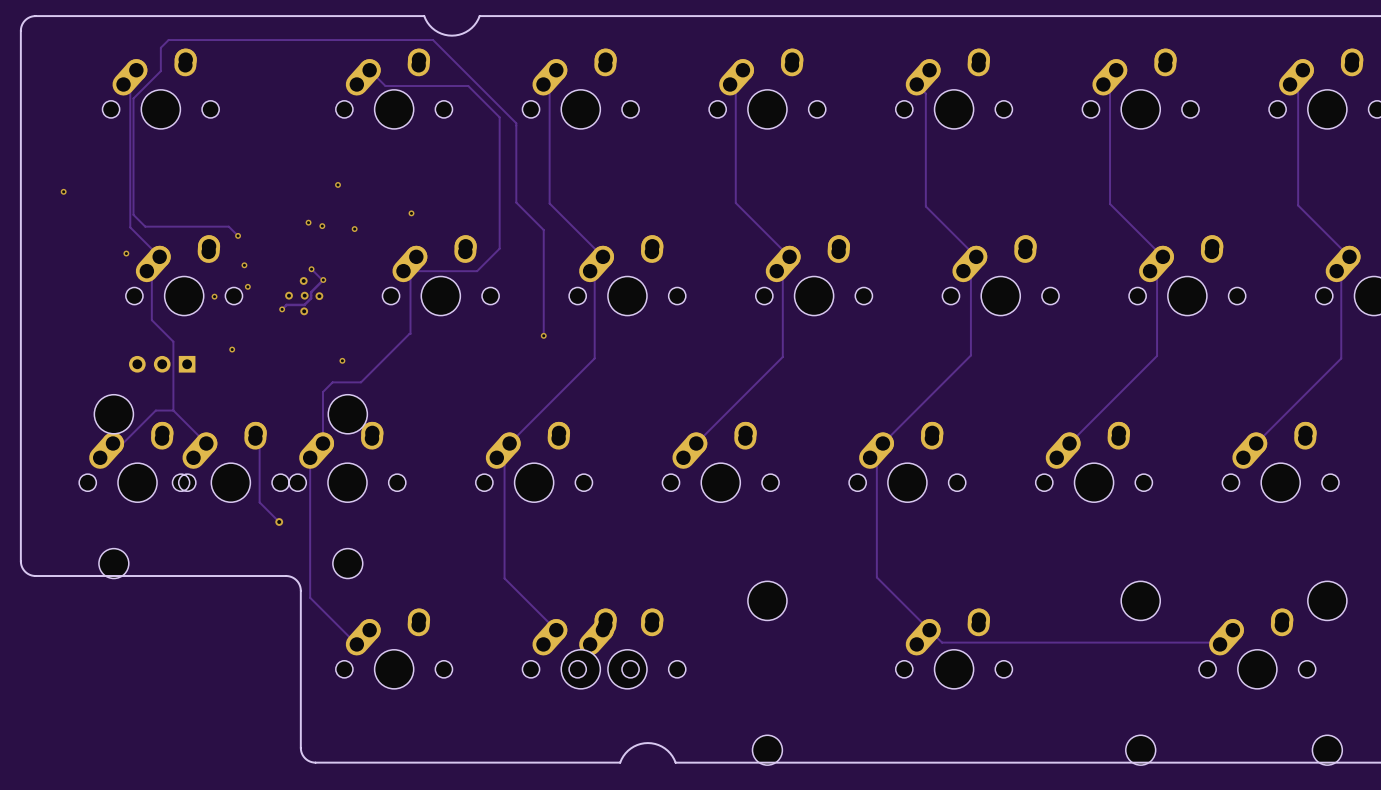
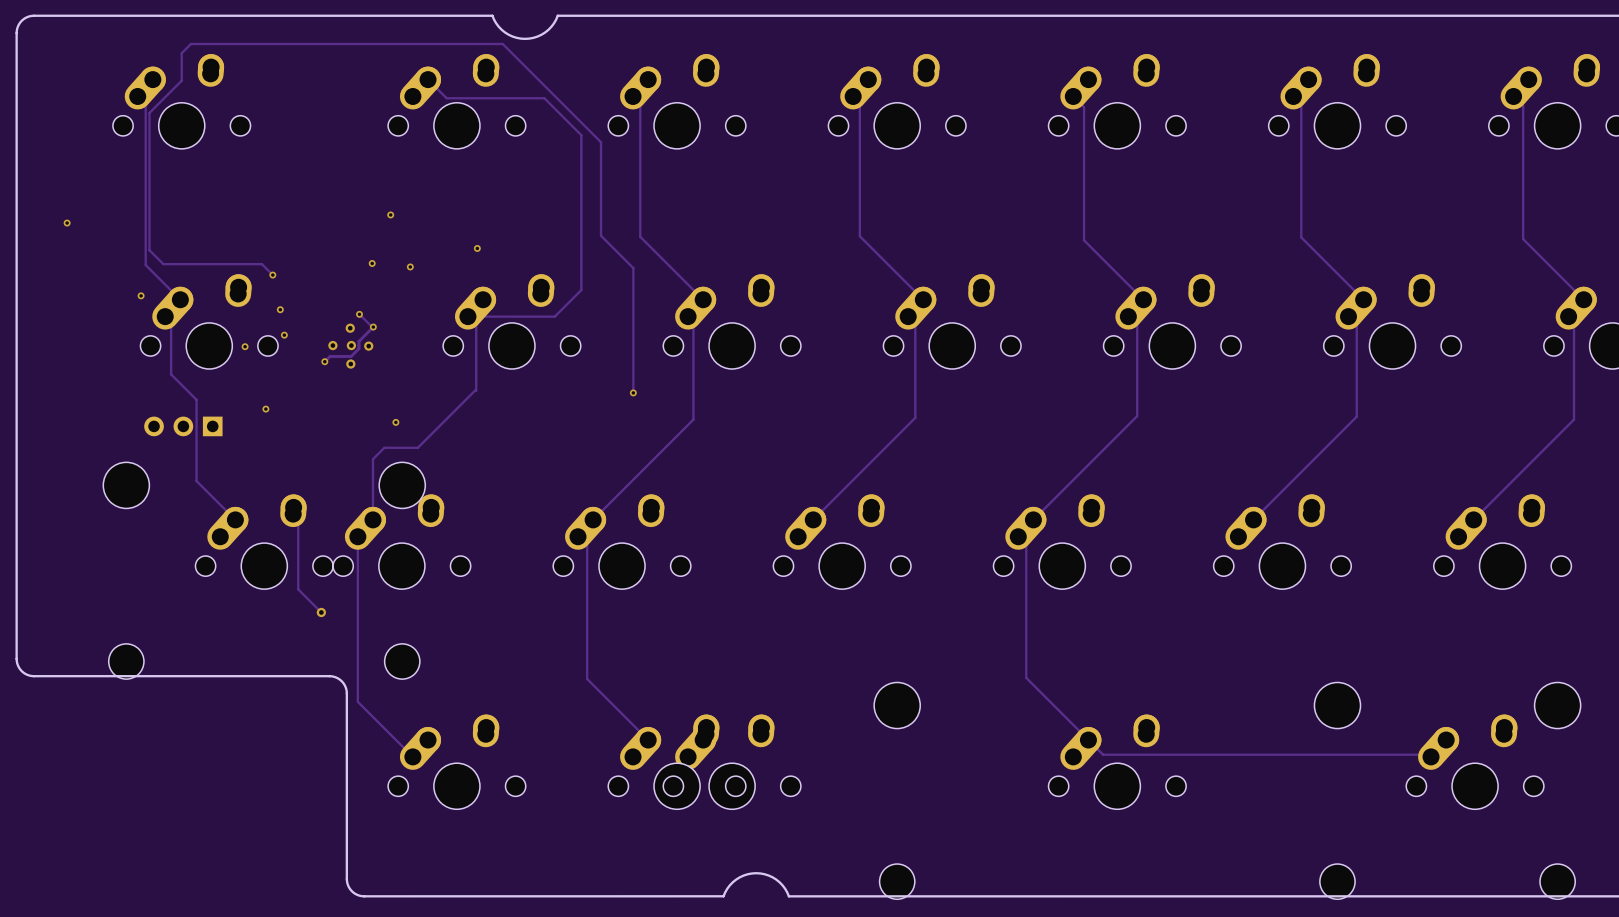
via: (308, 222) -> none
track: (173, 410) (155, 410) (122, 443) (113, 443) -> none
part: (137, 462) -> none

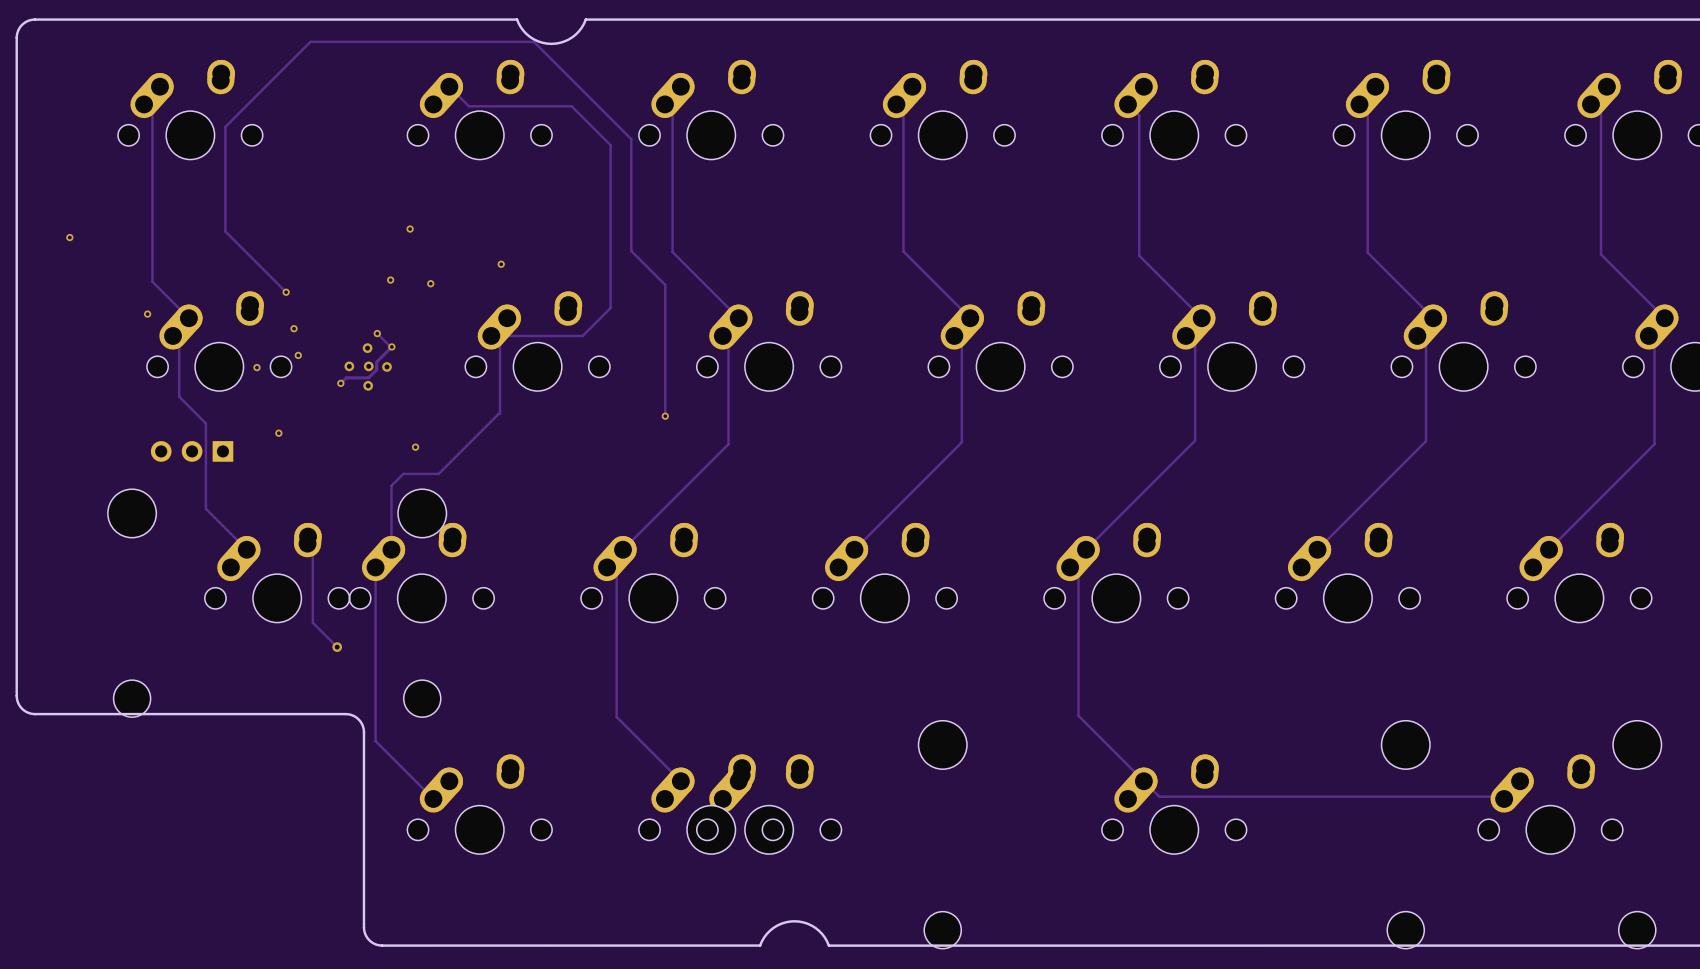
track: (601, 142) (502, 44) (190, 44) (181, 53) (181, 80) (149, 112) (149, 250) (163, 264) (261, 264) -> (631, 152) (631, 139) (534, 41) (310, 41) (225, 126) (225, 231) (274, 280)

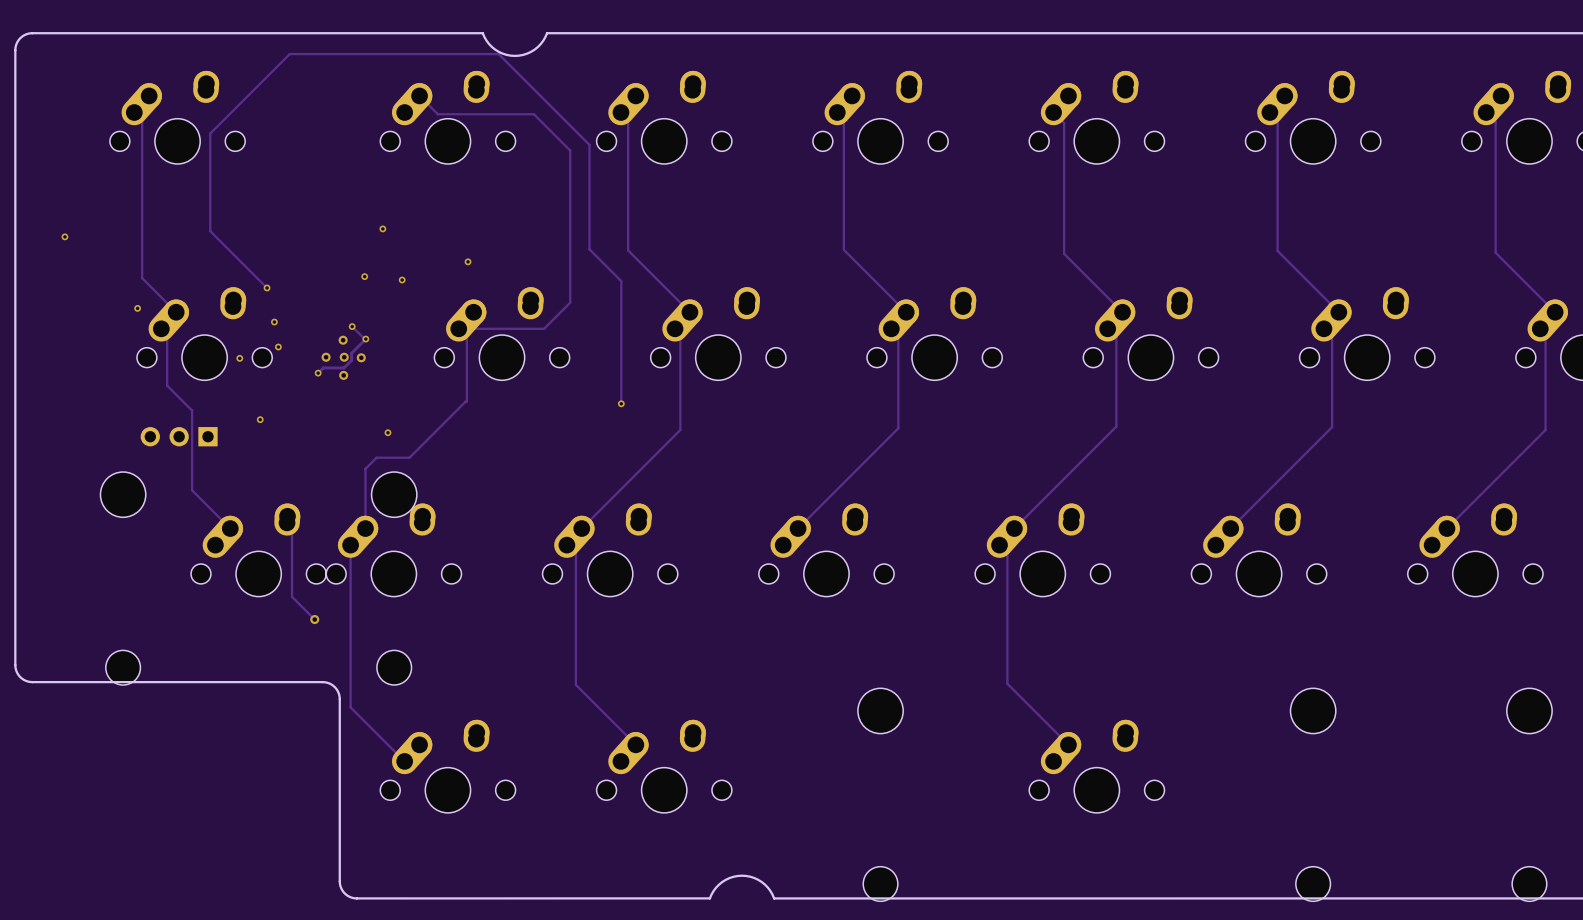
track: (1143, 781) (1159, 796) (1501, 796) (1504, 798) -> none
part: (769, 804) -> none
part: (1550, 804) -> none

